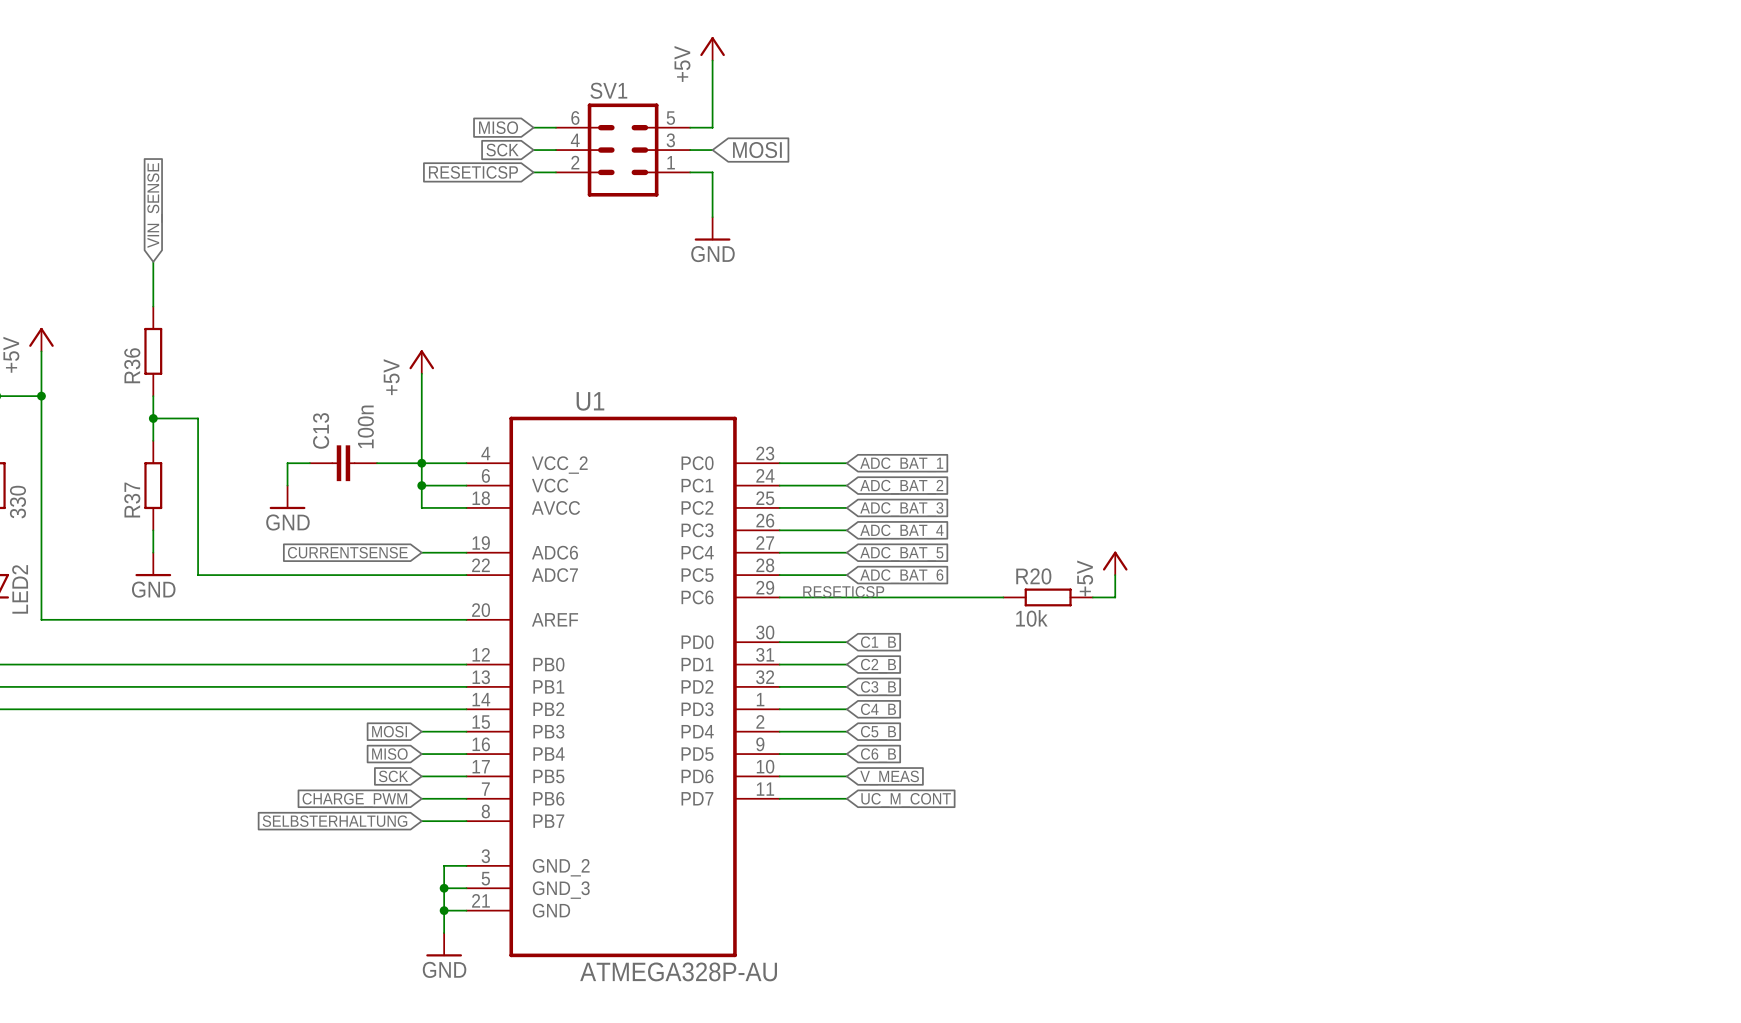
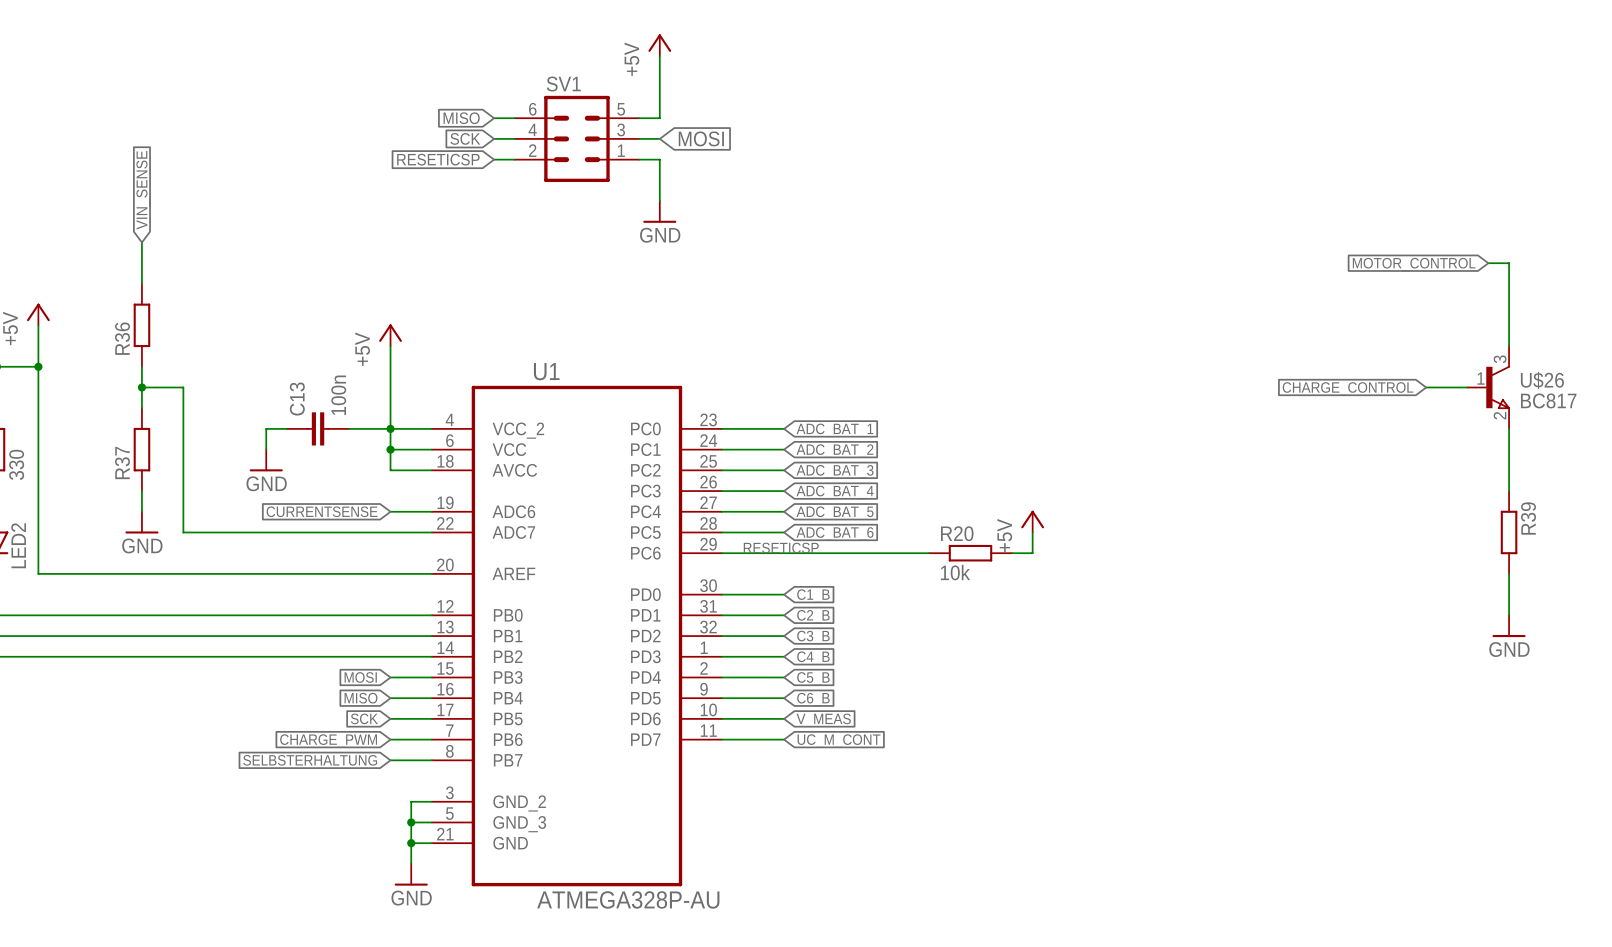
wire: none -> (1488, 263) (1509, 263) (1509, 346)
global label: none -> MOTOR_CONTROL (1414, 264)
wire: none -> (1426, 387) (1467, 387)
U$26: none -> BC817 (1488, 387)
global label: none -> CHARGE_CONTROL (1348, 388)
wire: none -> (1509, 428) (1509, 491)
R39: none -> (1509, 532)
wire: none -> (1509, 573) (1509, 615)
power symbol: none -> GND (1509, 626)

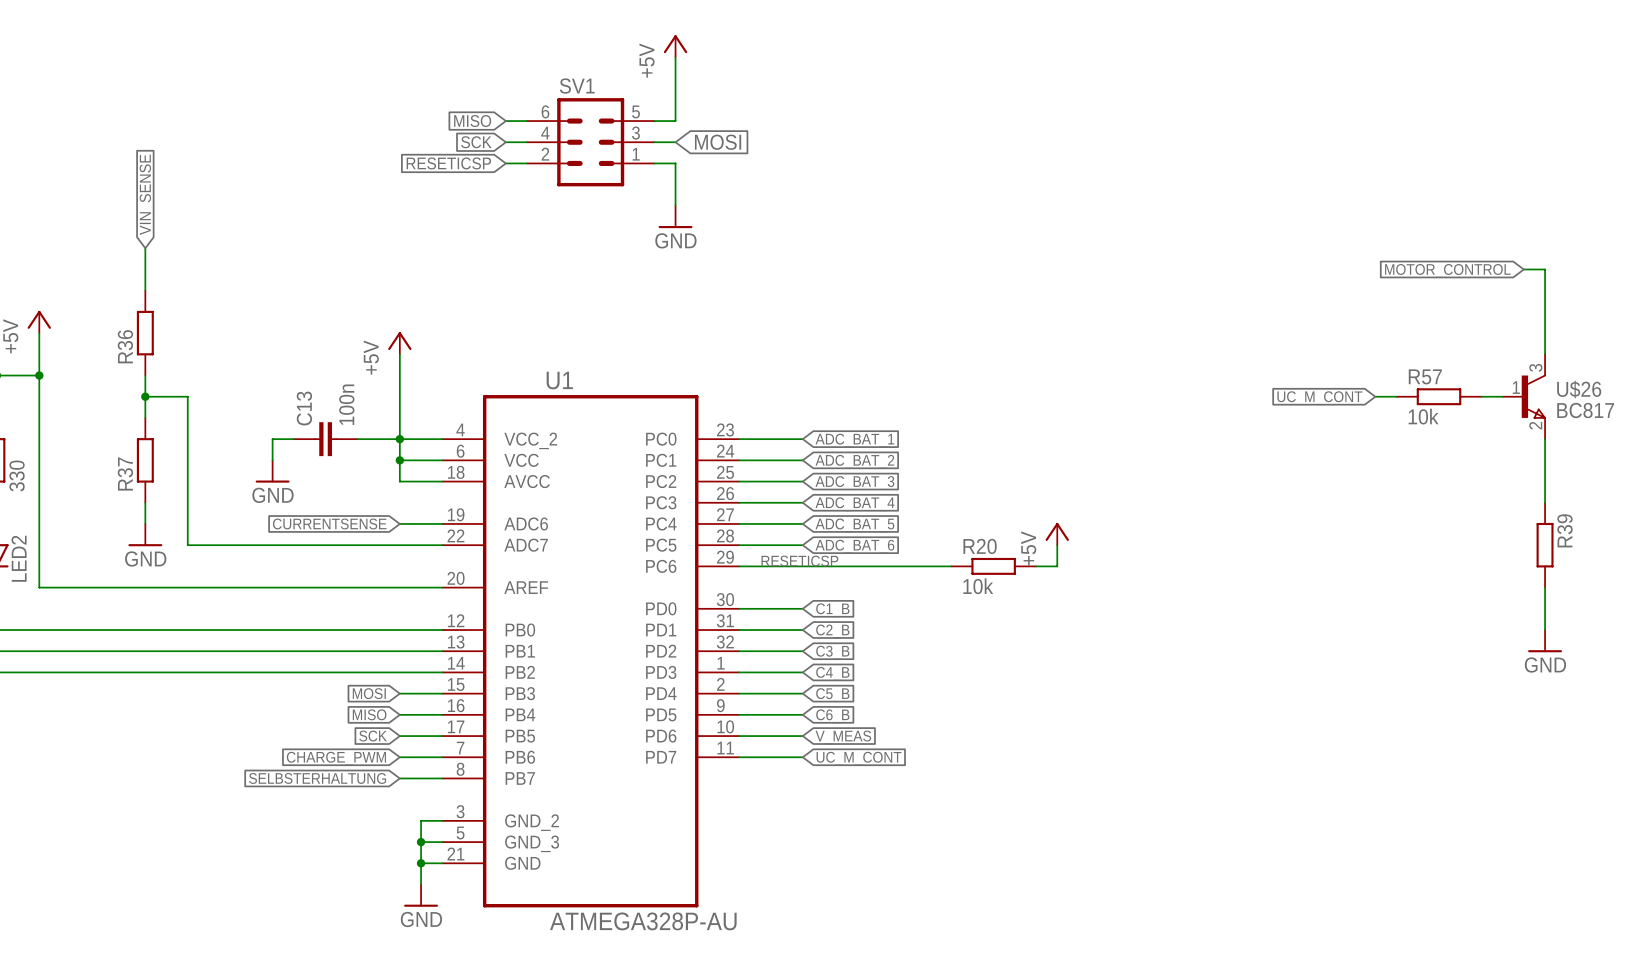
R57: none -> 10k (1439, 396)
global label: none -> UC_M_CONT (1319, 398)
global label: CHARGE_CONTROL (1348, 388) -> none

